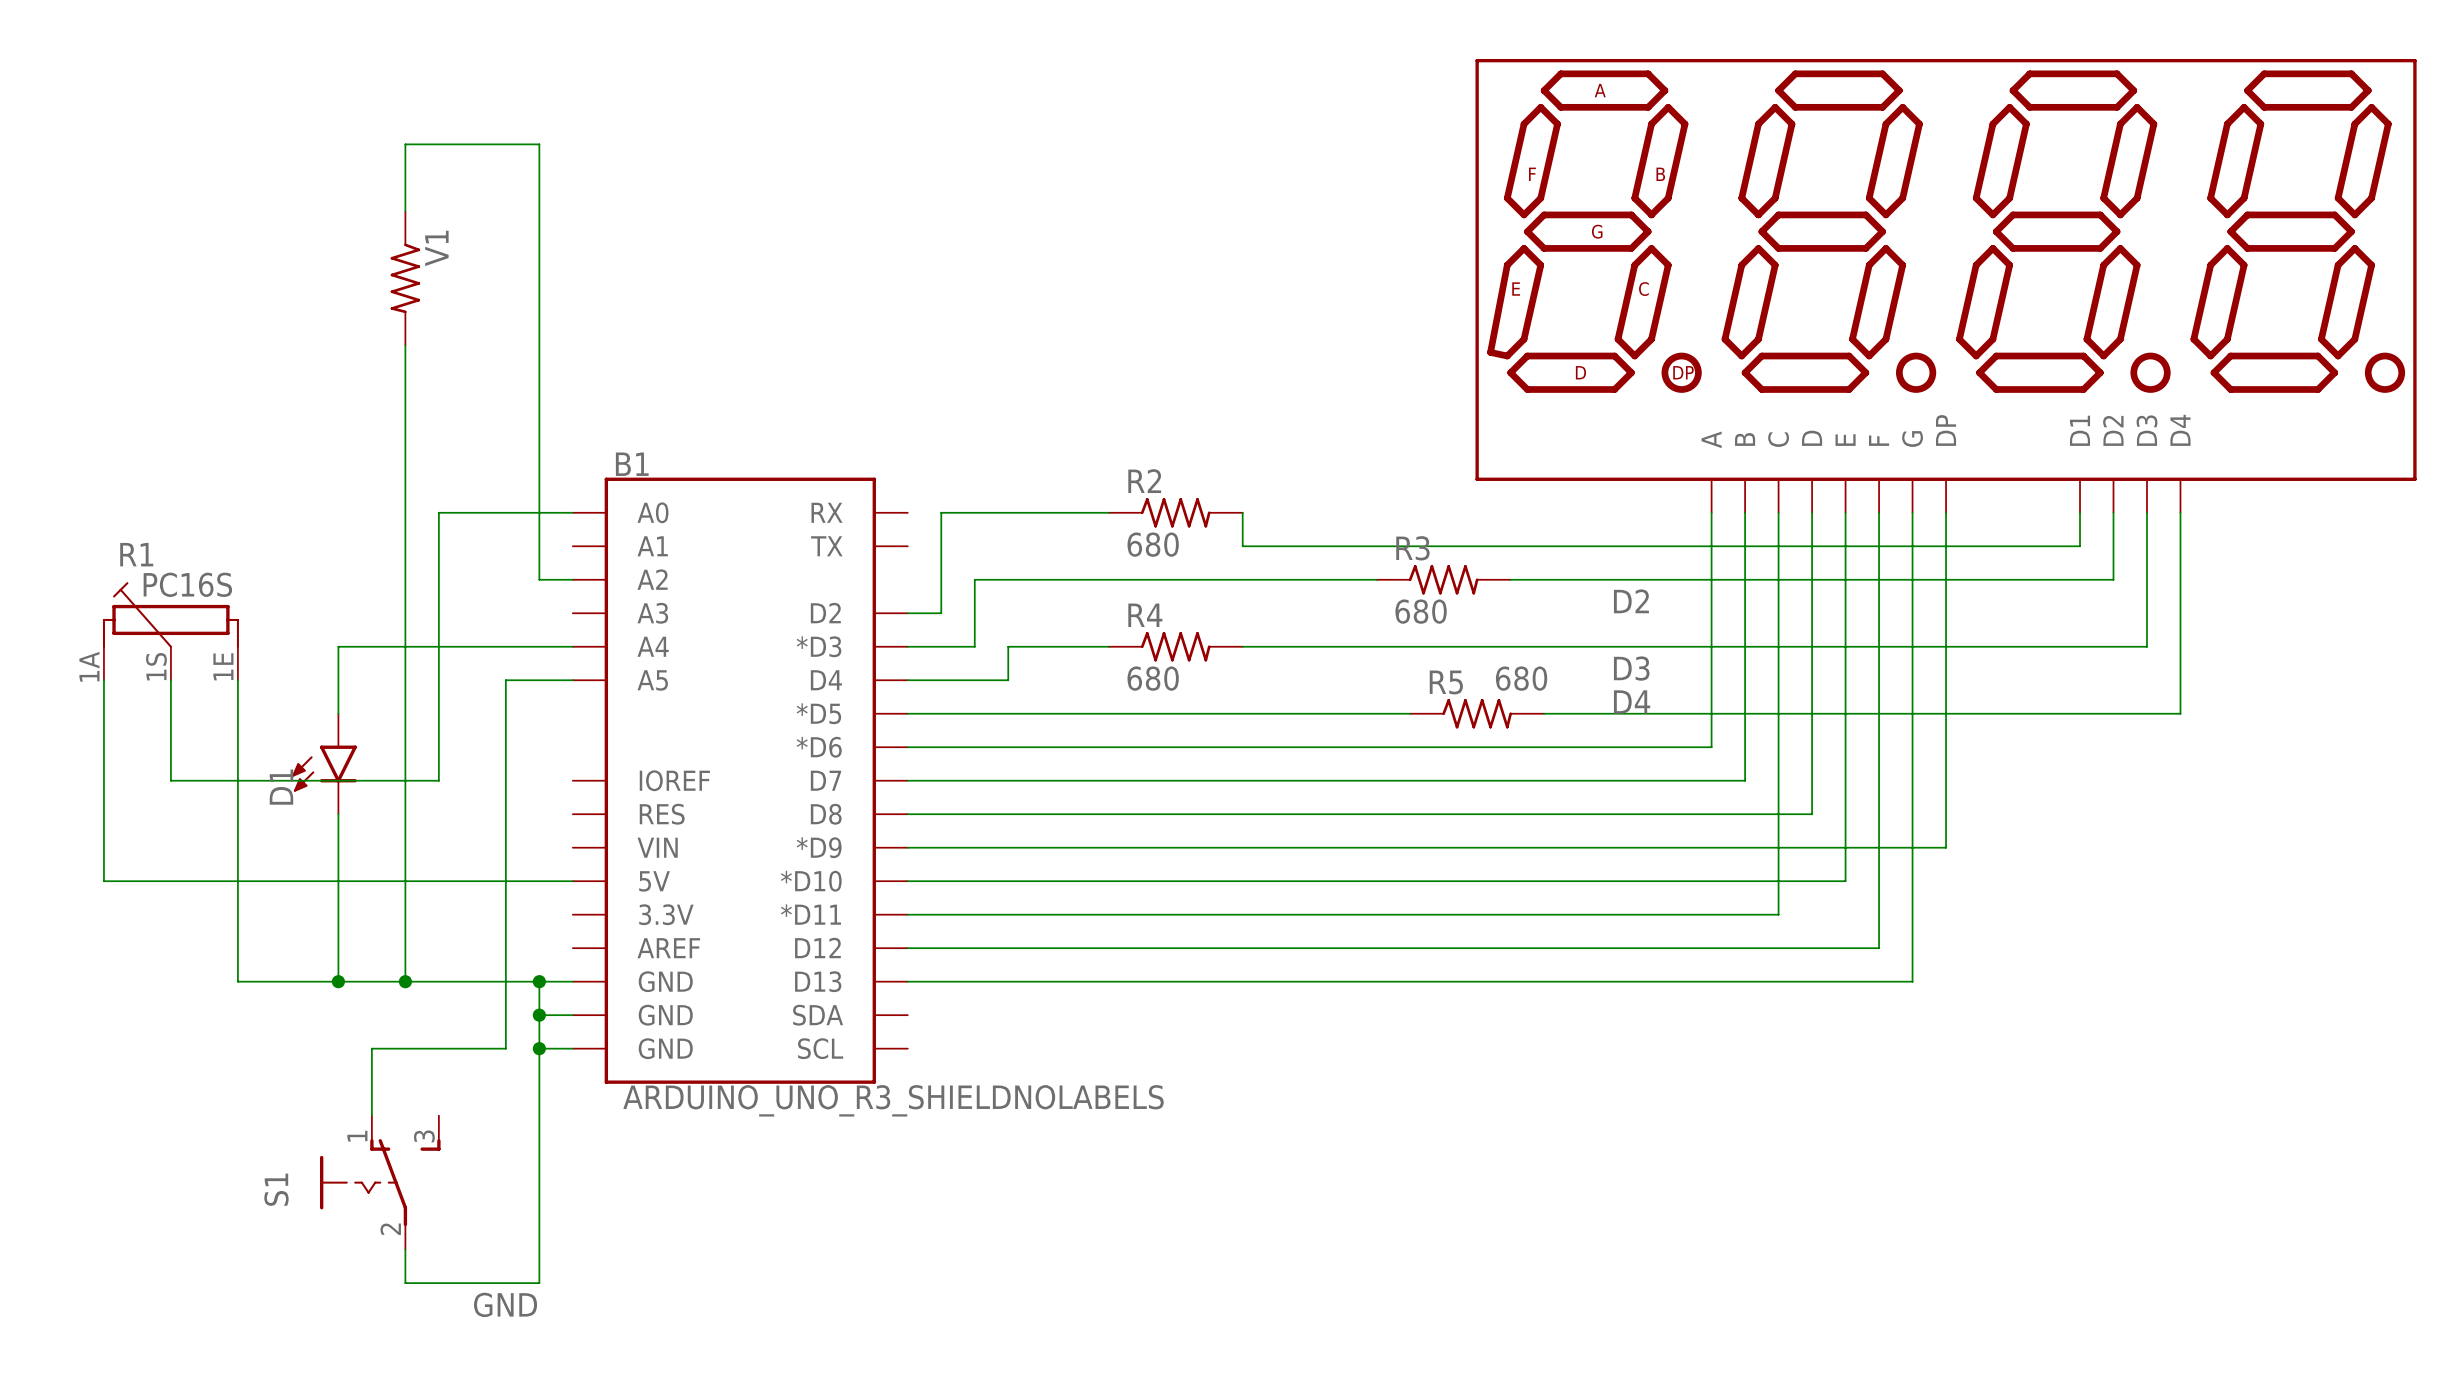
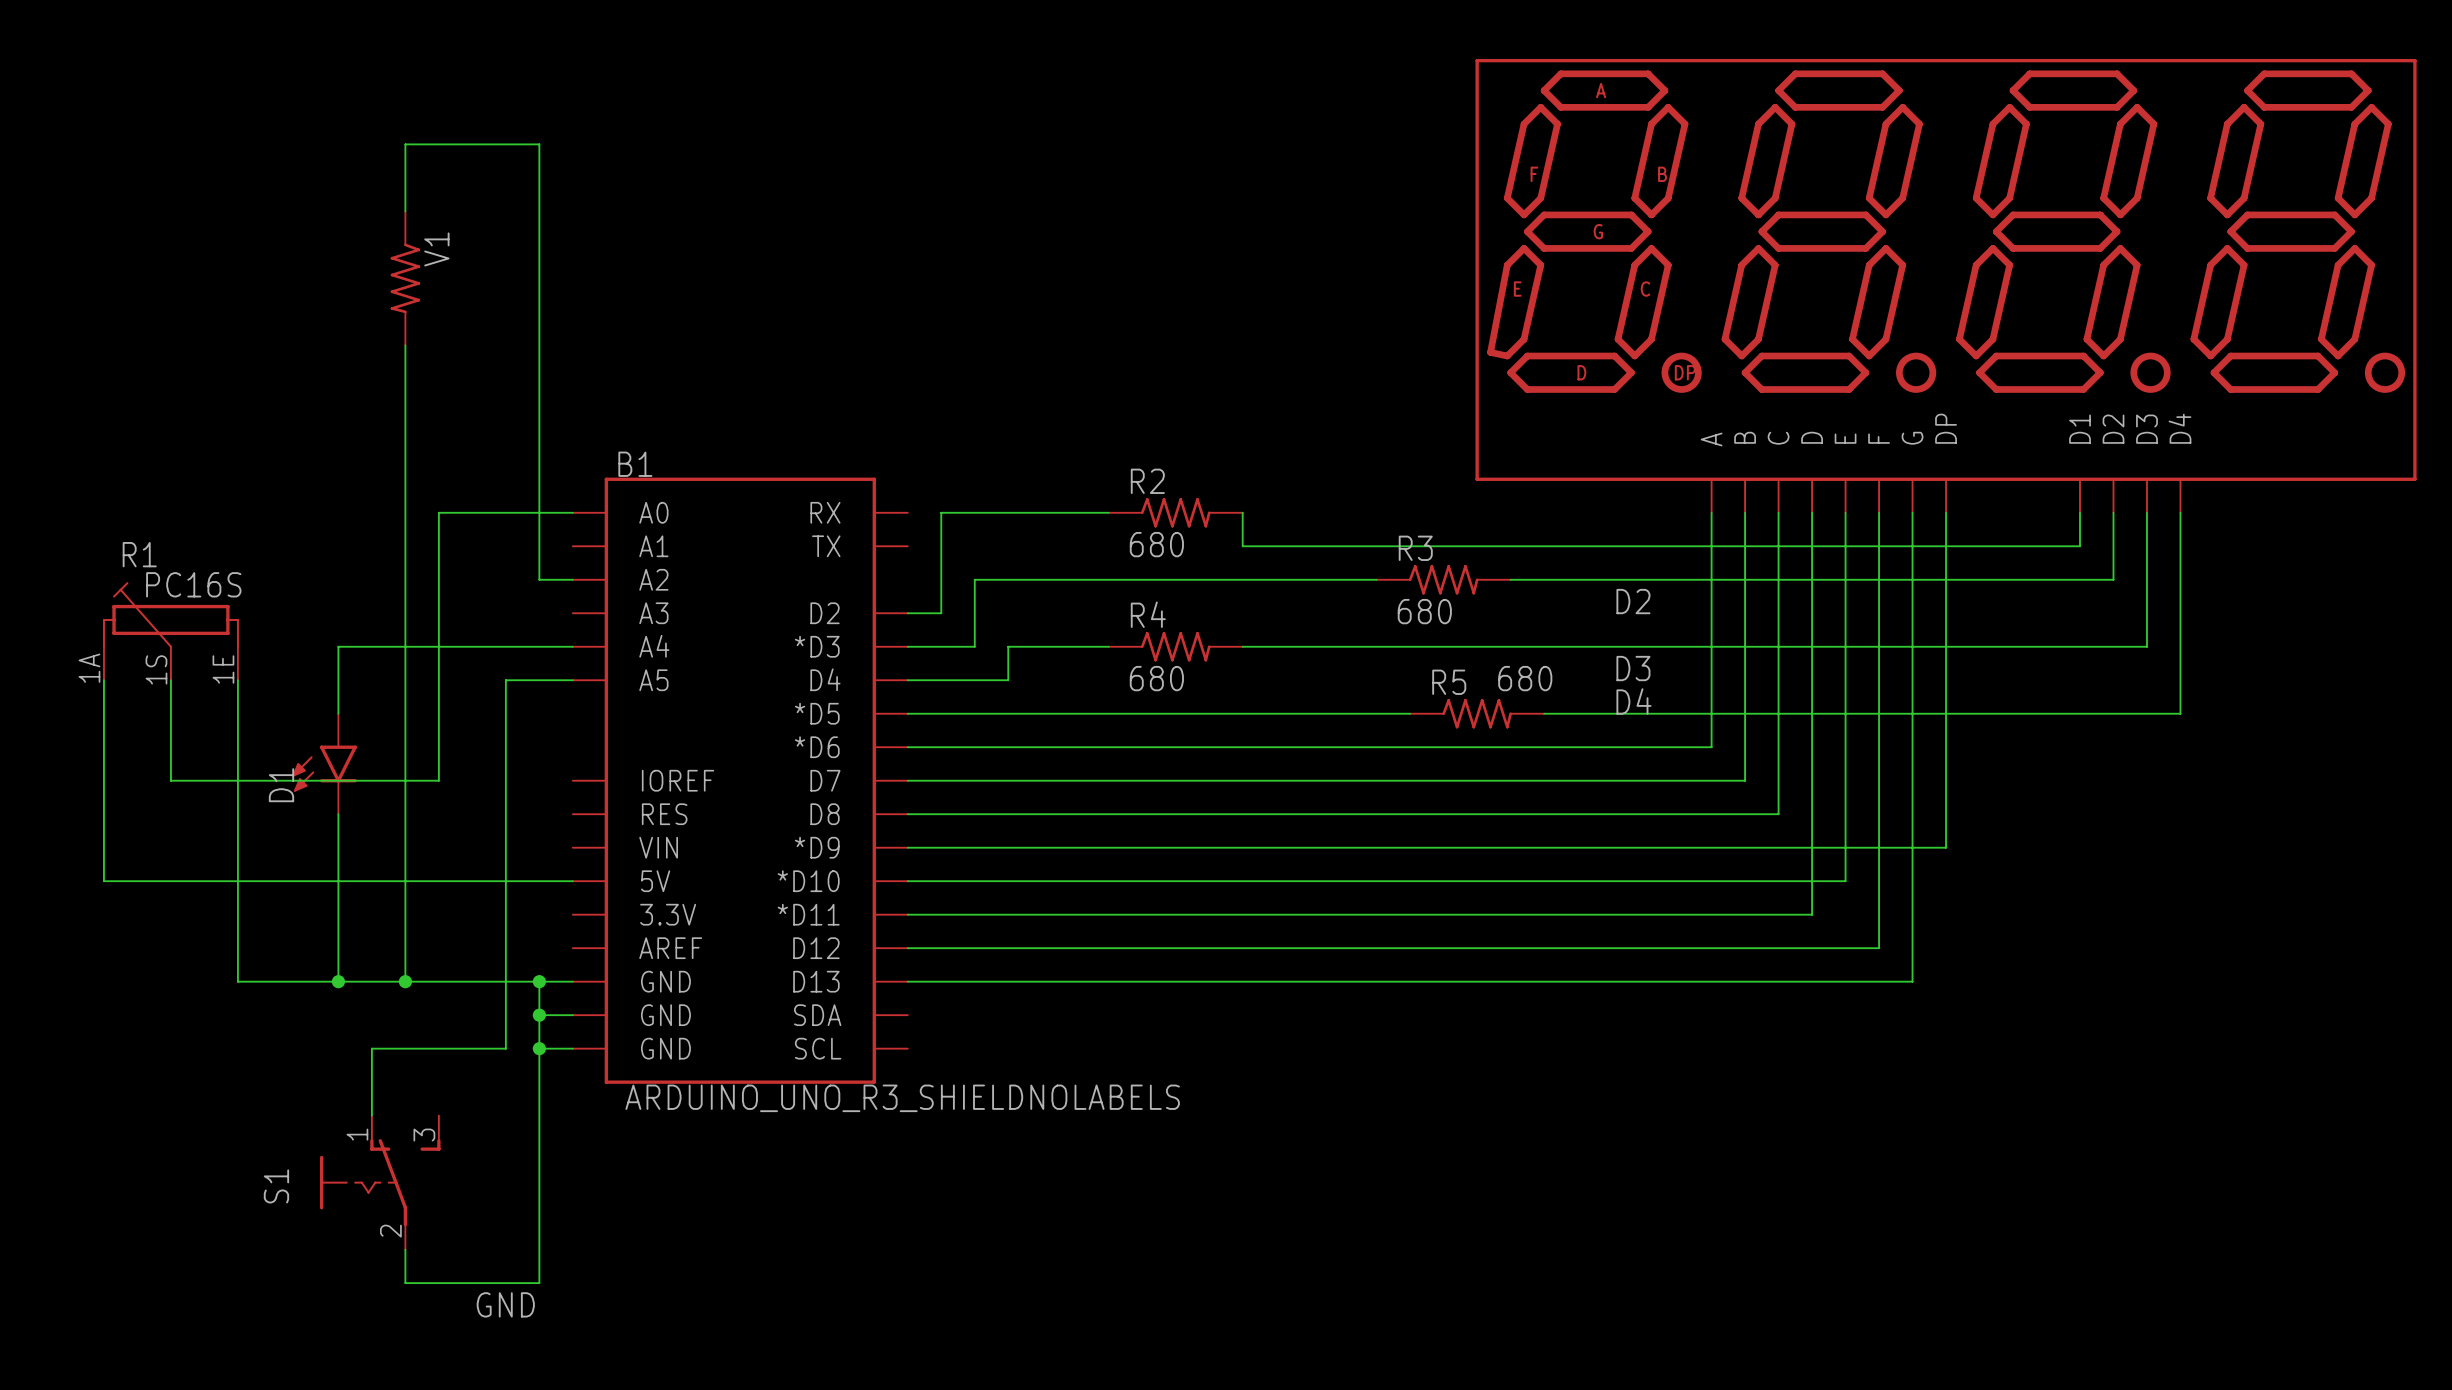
wire: (1812, 814) (1778, 814) (1778, 914) -> (1812, 814) (1812, 914) (1778, 914)

